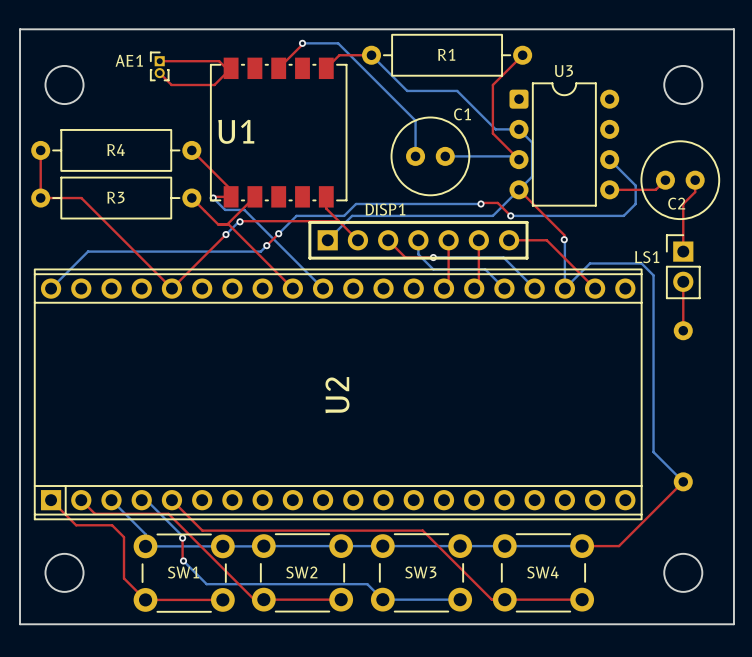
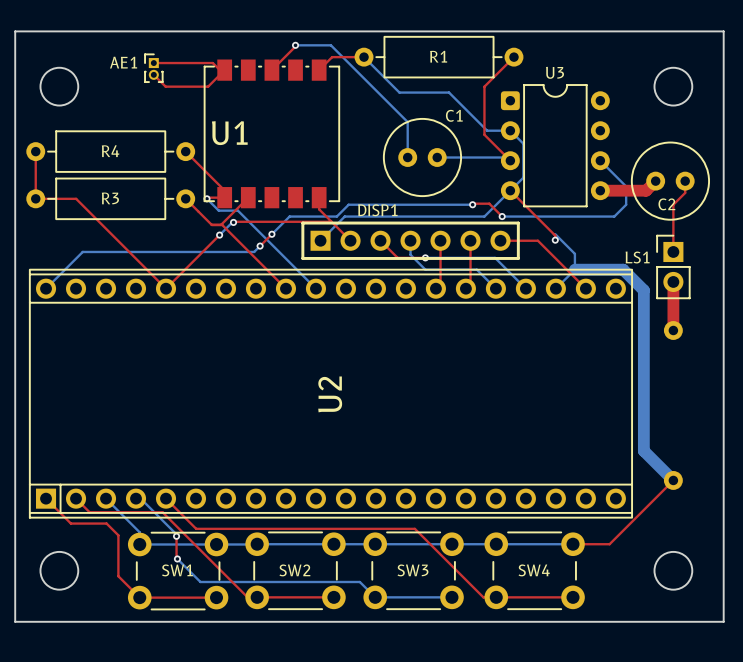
top track width: thin (665, 180) (655, 189) (609, 189) -> thick (655, 181) (646, 190) (600, 190)
bottom track: (564, 239) (564, 288) -> none
bottom track: (584, 269) (589, 263) (641, 263) (653, 275) (653, 290) -> (555, 234) (574, 253) (574, 269) (623, 269) (643, 290)
top track width: thin (683, 281) (683, 330) -> thick (673, 281) (673, 330)
bottom track width: thin (653, 290) (653, 452) (683, 481) -> thick (643, 290) (643, 450) (673, 480)

